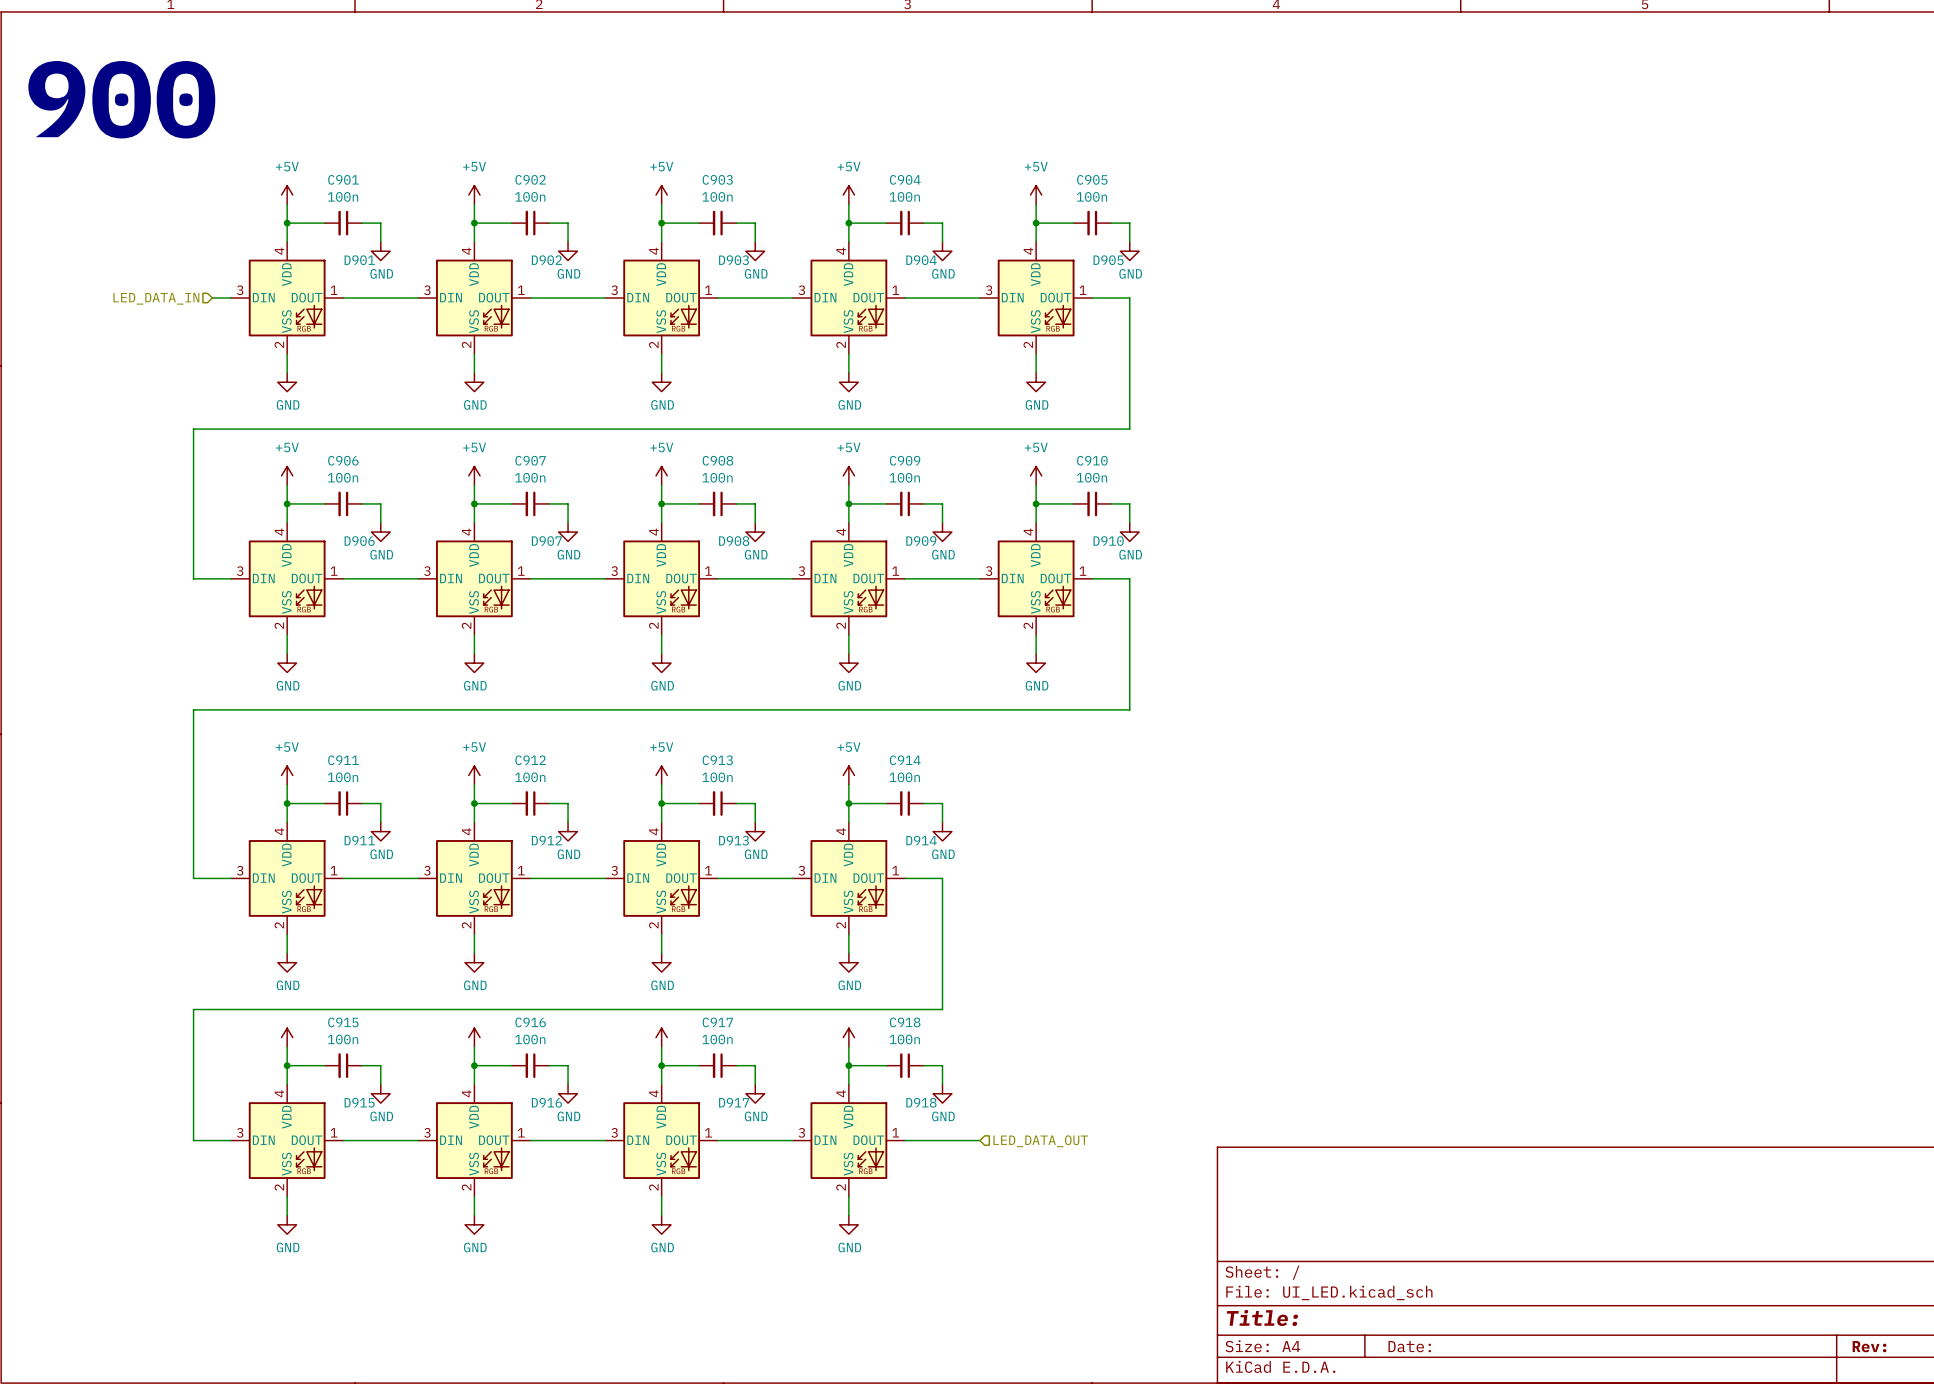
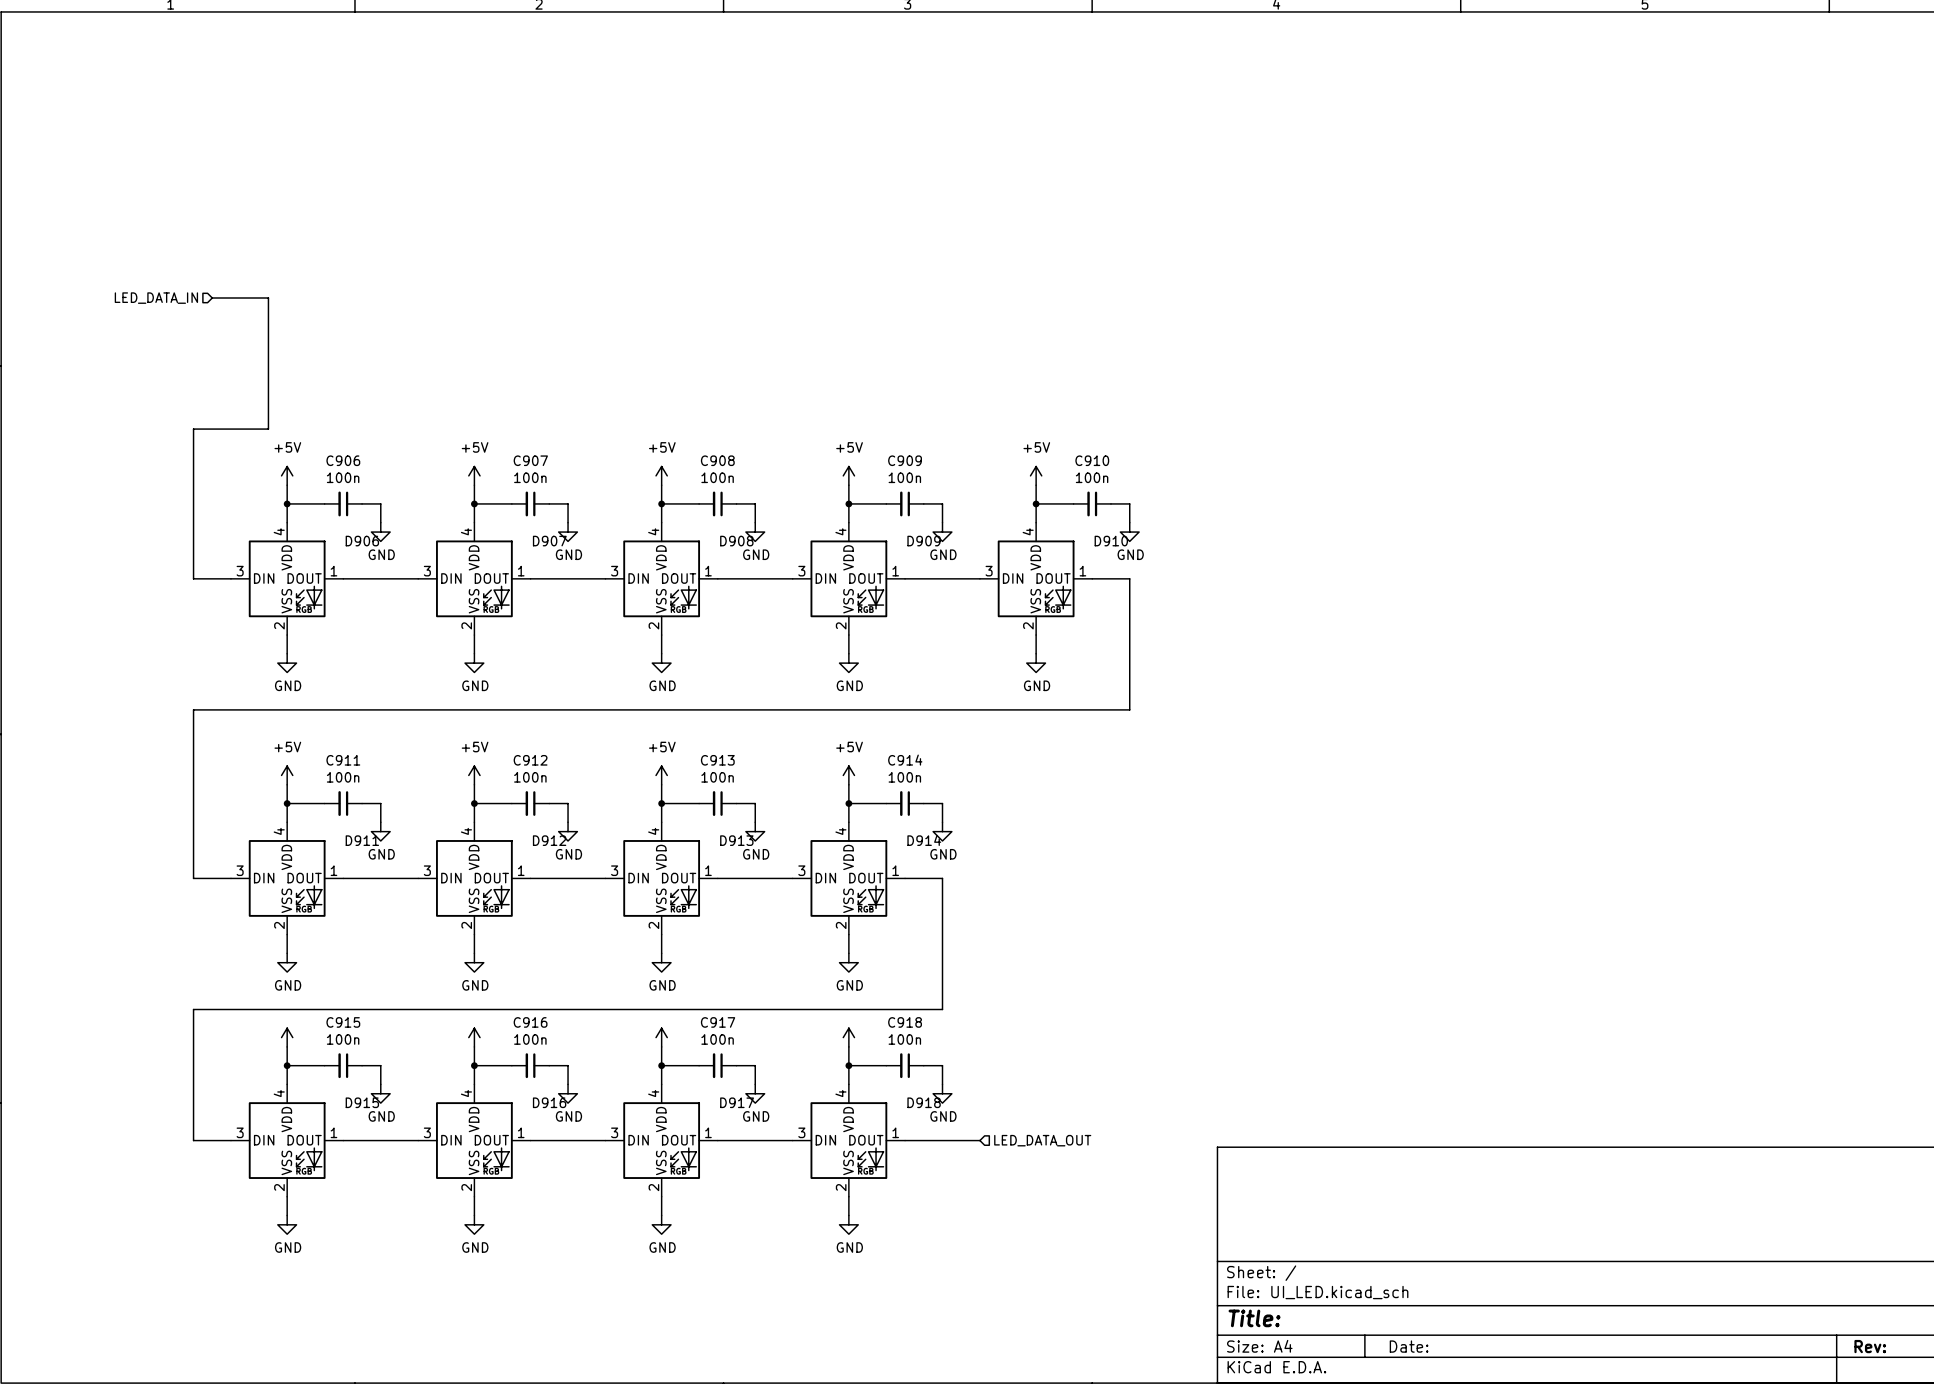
text: 900 (121, 99) -> none
power symbol: +5V (287, 195) -> none
power symbol: +5V (474, 195) -> none
power symbol: +5V (661, 195) -> none
power symbol: +5V (848, 195) -> none
power symbol: +5V (1036, 195) -> none
wire: (287, 204) (287, 241) -> none
wire: (474, 204) (474, 241) -> none
wire: (661, 204) (661, 241) -> none
wire: (848, 204) (848, 241) -> none
wire: (1036, 204) (1036, 241) -> none
wire: (287, 223) (324, 223) -> none
junction: (287, 223) -> none
C901: 100n (343, 223) -> none
wire: (362, 223) (380, 223) (380, 241) -> none
wire: (474, 223) (511, 223) -> none
junction: (474, 223) -> none
C902: 100n (530, 223) -> none
wire: (549, 223) (568, 223) (568, 241) -> none
wire: (661, 223) (699, 223) -> none
junction: (661, 223) -> none
C903: 100n (717, 223) -> none
wire: (736, 223) (755, 223) (755, 241) -> none
wire: (848, 223) (886, 223) -> none
junction: (848, 223) -> none
C904: 100n (905, 223) -> none
wire: (923, 223) (942, 223) (942, 241) -> none
wire: (1036, 223) (1073, 223) -> none
junction: (1036, 223) -> none
C905: 100n (1092, 223) -> none
wire: (1111, 223) (1129, 223) (1129, 241) -> none
power symbol: GND (380, 251) -> none
power symbol: GND (568, 251) -> none
power symbol: GND (755, 251) -> none
power symbol: GND (942, 251) -> none
power symbol: GND (1129, 251) -> none
D901: (287, 298) -> none
wire: (343, 298) (418, 298) -> none
D902: (474, 298) -> none
wire: (530, 298) (605, 298) -> none
D903: (661, 298) -> none
wire: (717, 298) (792, 298) -> none
D904: (848, 298) -> none
wire: (905, 298) (979, 298) -> none
D905: (1036, 298) -> none
wire: (1092, 298) (1129, 298) (1129, 429) (268, 429) -> (230, 298) (268, 298) (268, 429)
wire: (287, 354) (287, 372) -> none
wire: (474, 354) (474, 372) -> none
wire: (661, 354) (661, 372) -> none
wire: (848, 354) (848, 372) -> none
wire: (1036, 354) (1036, 372) -> none
power symbol: GND (287, 382) -> none
power symbol: GND (474, 382) -> none
power symbol: GND (661, 382) -> none
power symbol: GND (848, 382) -> none
power symbol: GND (1036, 382) -> none

